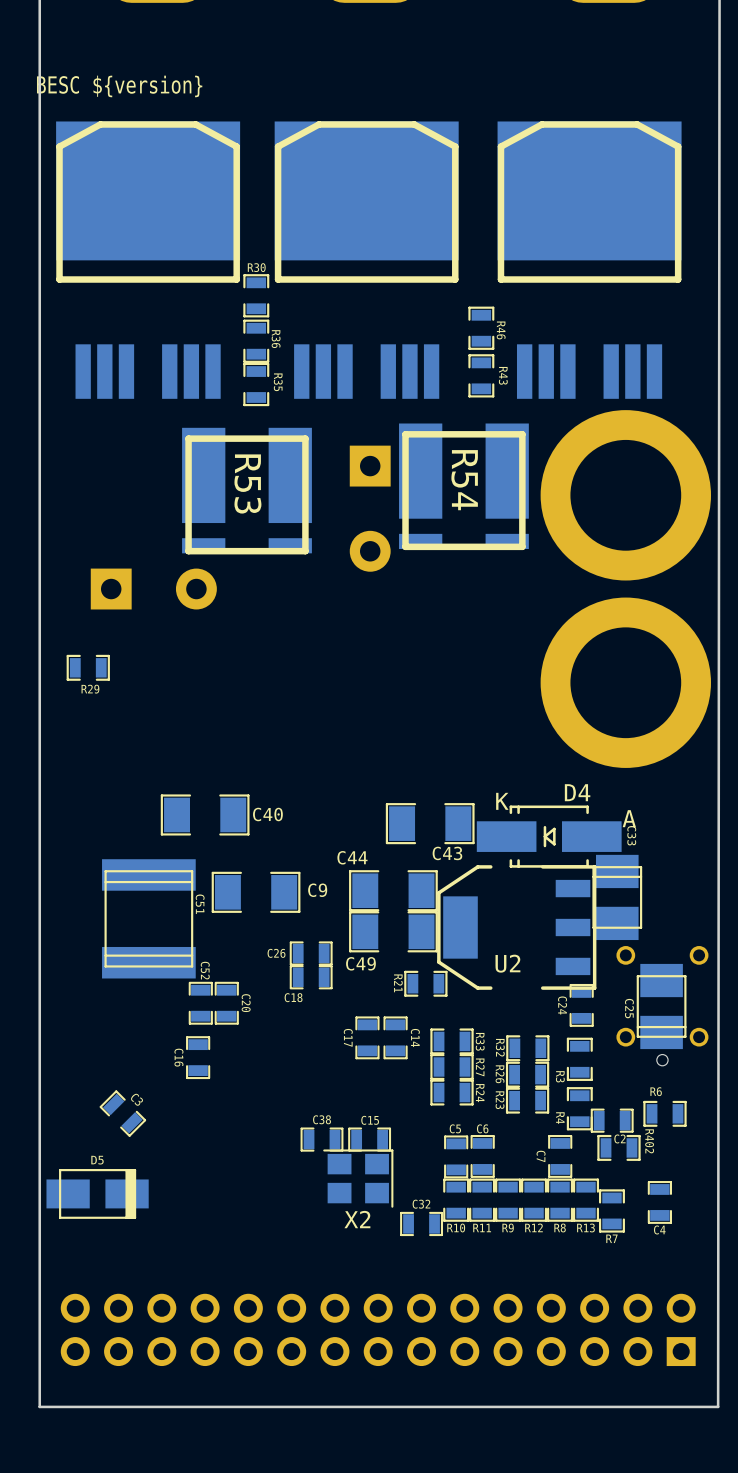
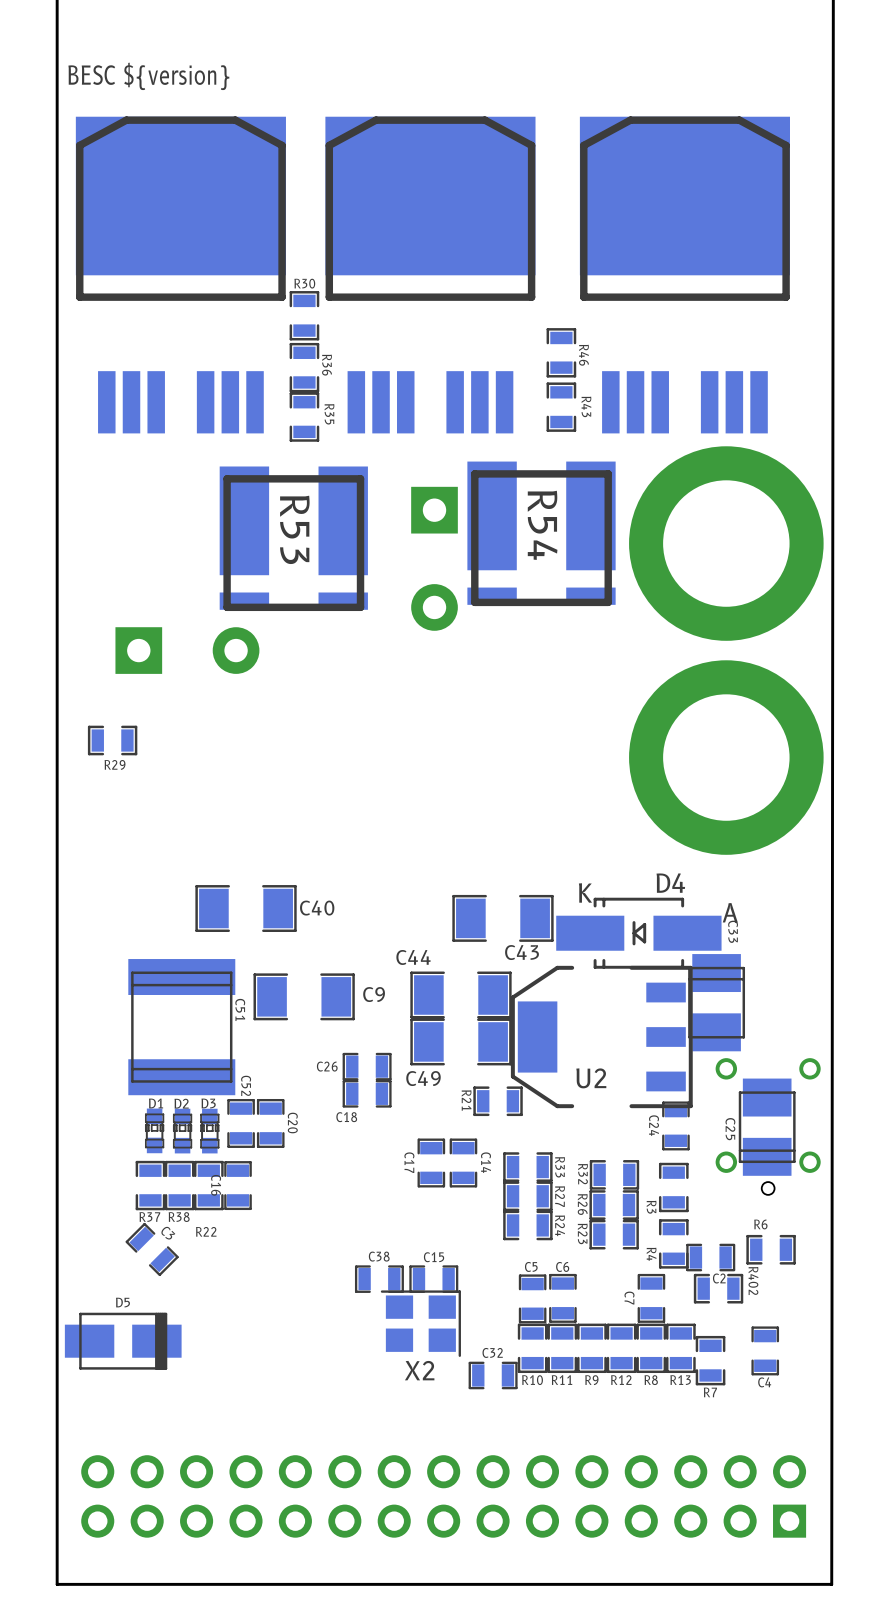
D1: none -> (154, 1130)
D2: none -> (182, 1131)
D3: none -> (209, 1131)
R37: none -> (150, 1185)
R38: none -> (179, 1185)
R22: none -> (208, 1185)

